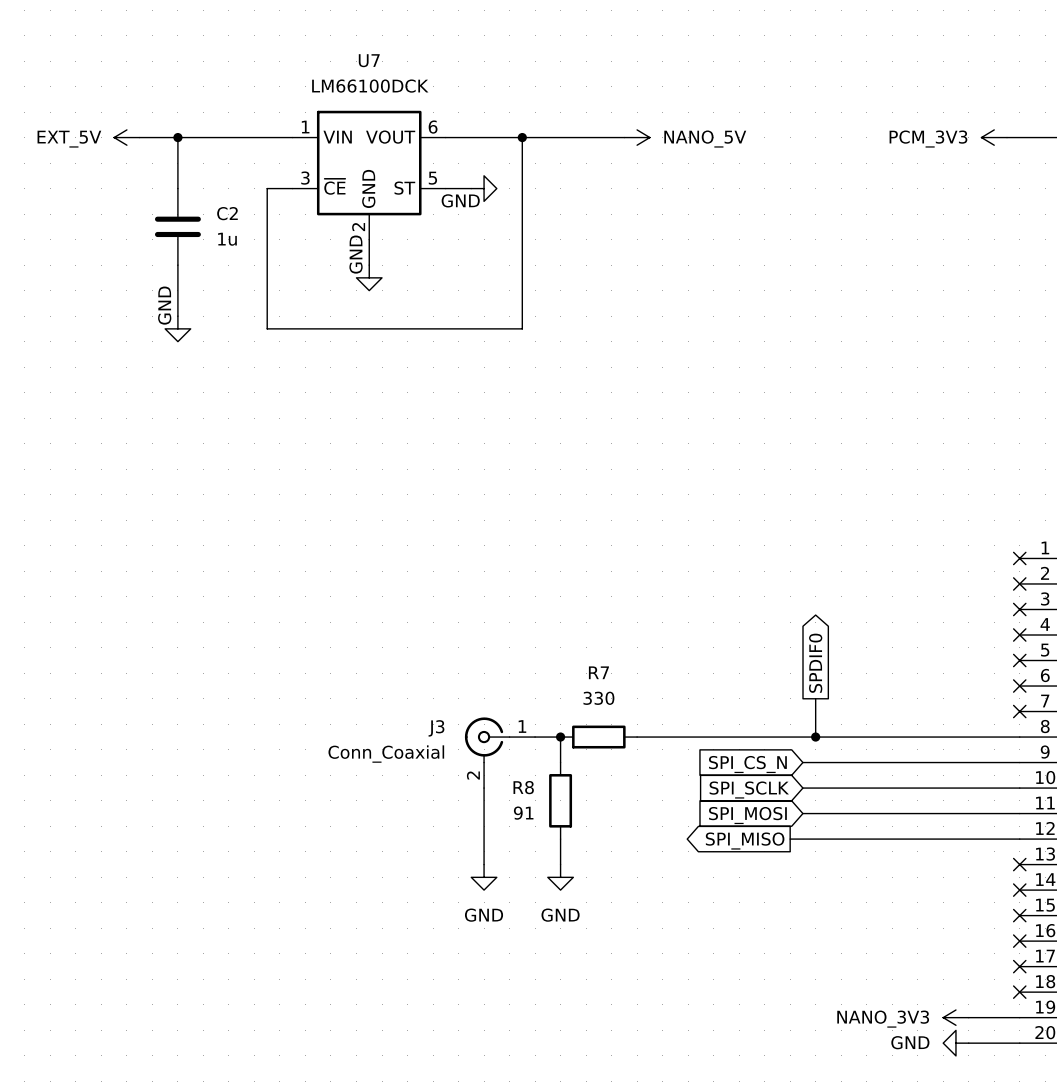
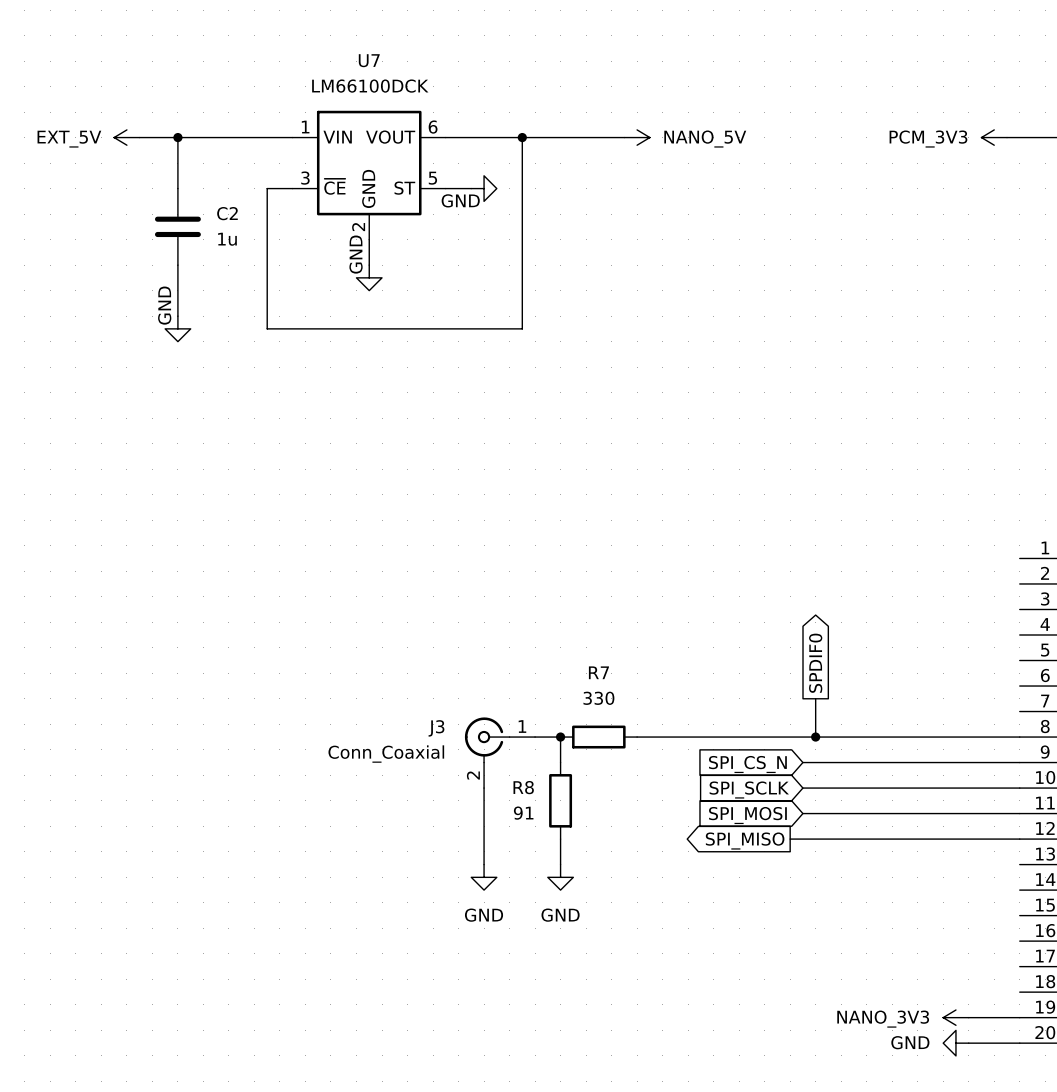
no-connect mark: (1019, 558) -> none
no-connect mark: (1019, 583) -> none
no-connect mark: (1019, 609) -> none
no-connect mark: (1019, 635) -> none
no-connect mark: (1019, 660) -> none
no-connect mark: (1019, 686) -> none
no-connect mark: (1019, 711) -> none
no-connect mark: (1019, 864) -> none
no-connect mark: (1019, 890) -> none
no-connect mark: (1019, 915) -> none
no-connect mark: (1019, 941) -> none
no-connect mark: (1019, 966) -> none
no-connect mark: (1019, 992) -> none

